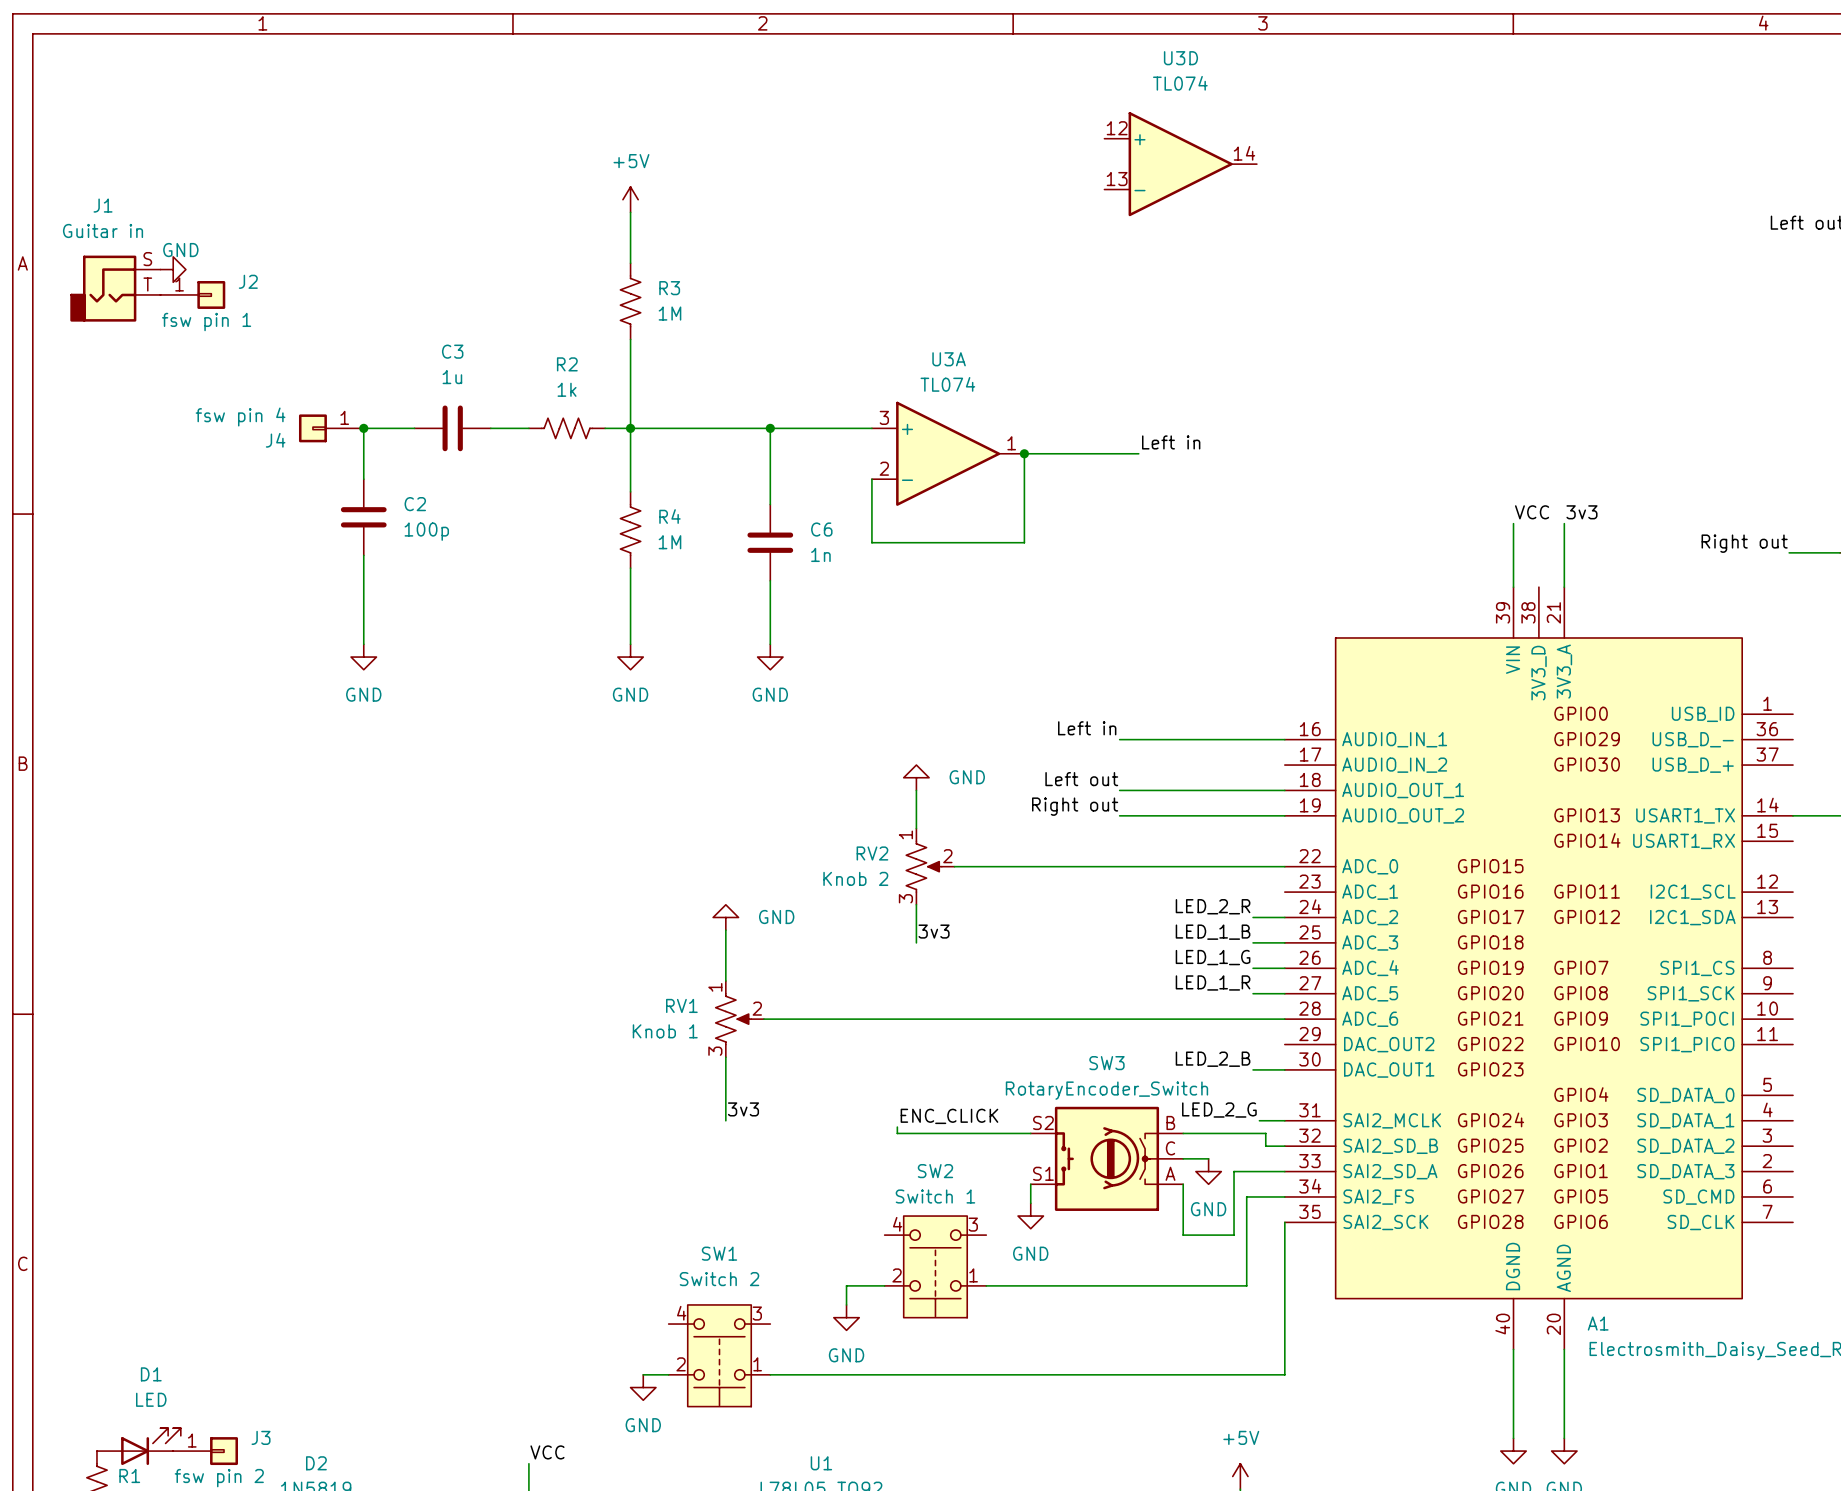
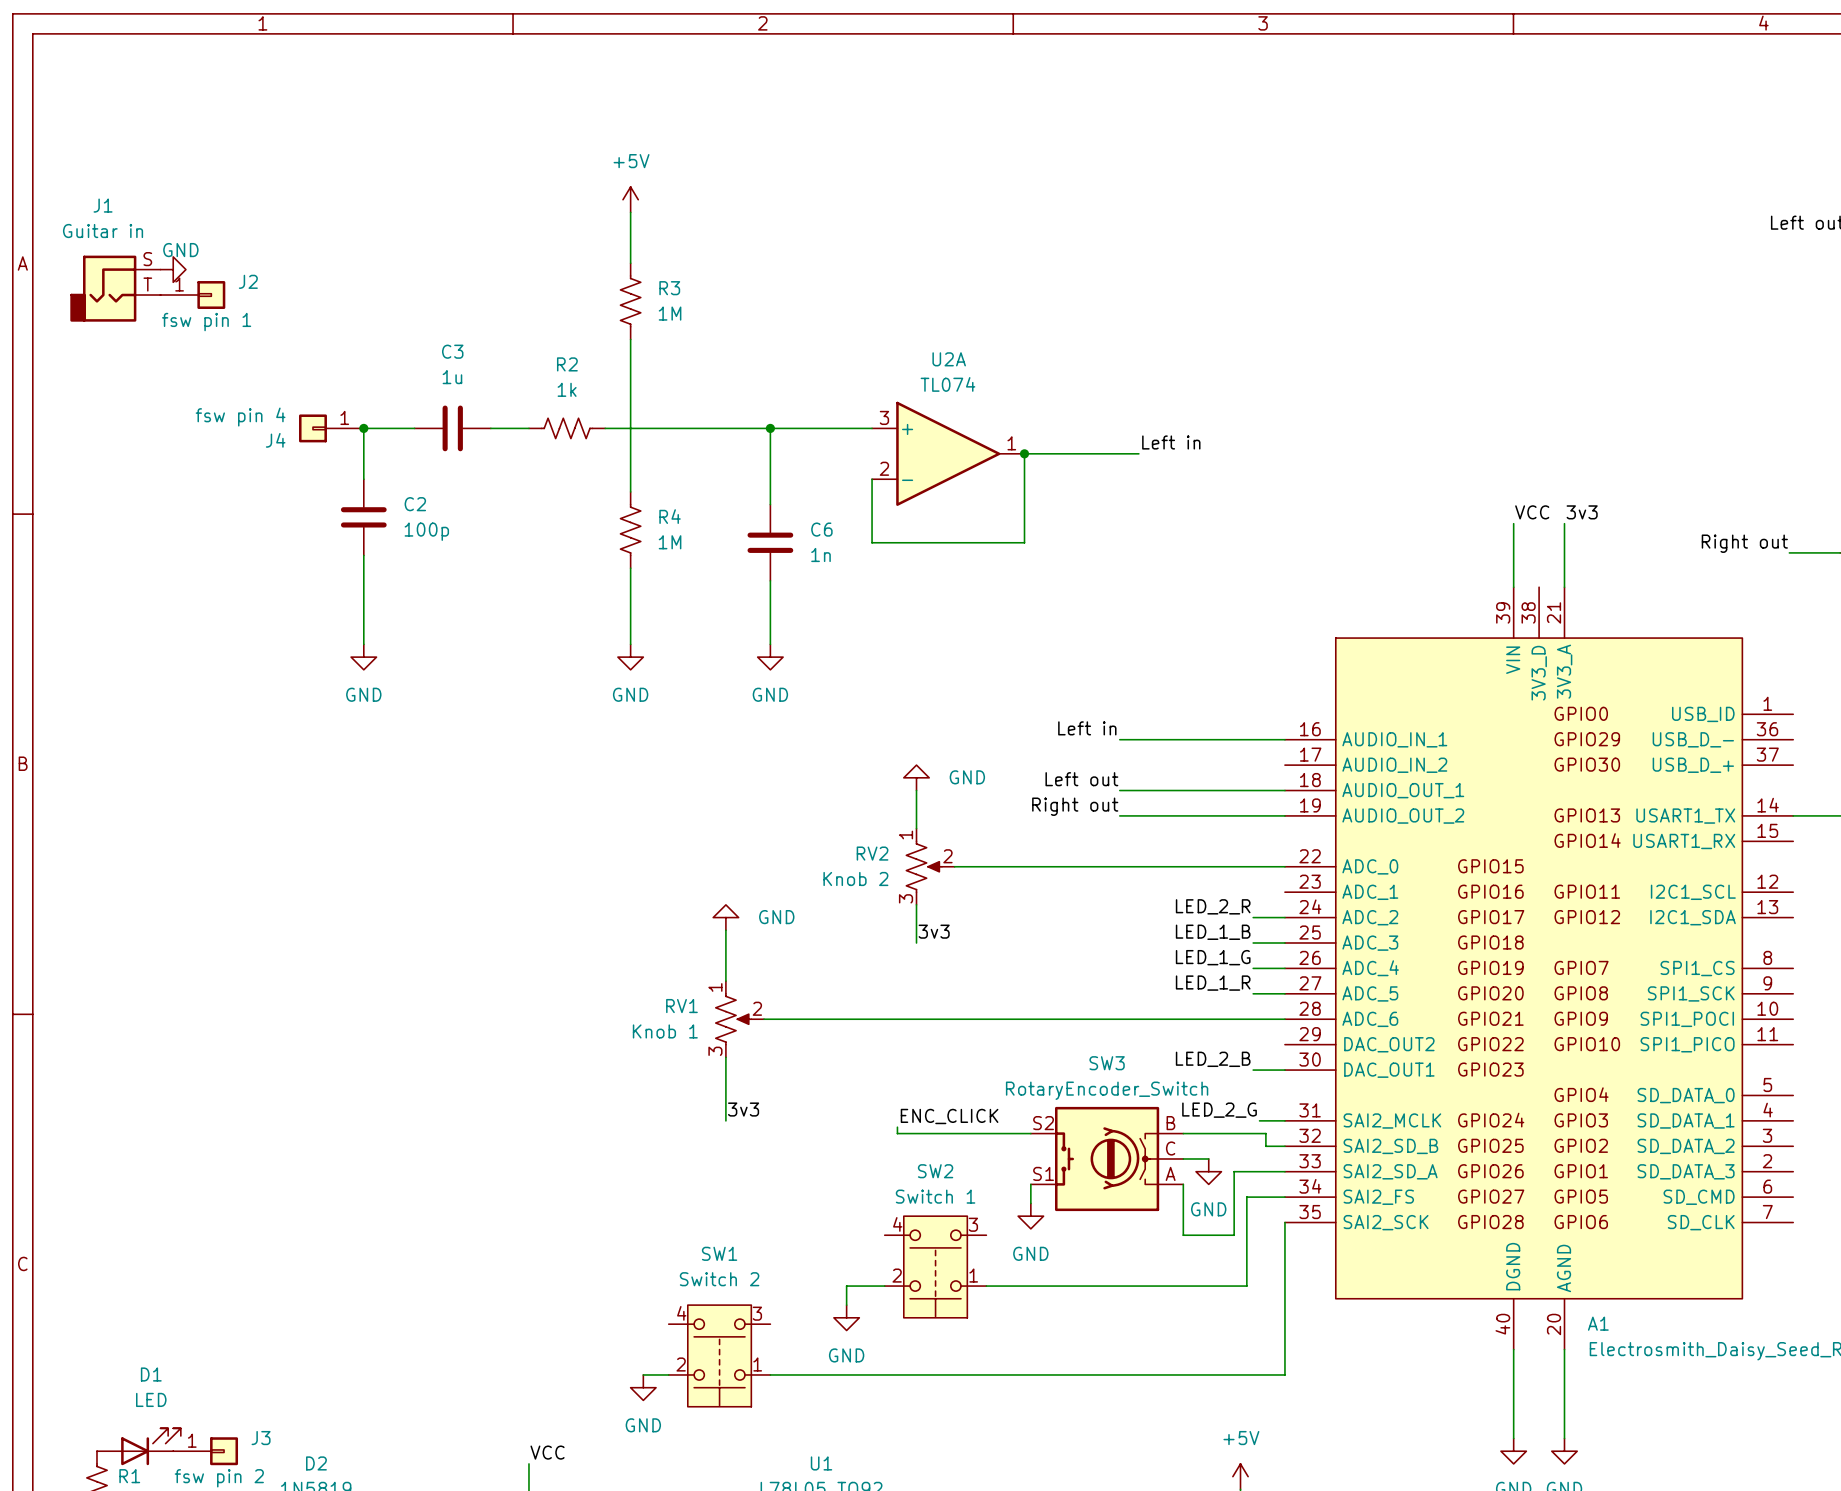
U3D: TL074 (1180, 164) -> none
U3A name: U3A (949, 359) -> U2A (949, 359)
junction: (630, 428) -> none

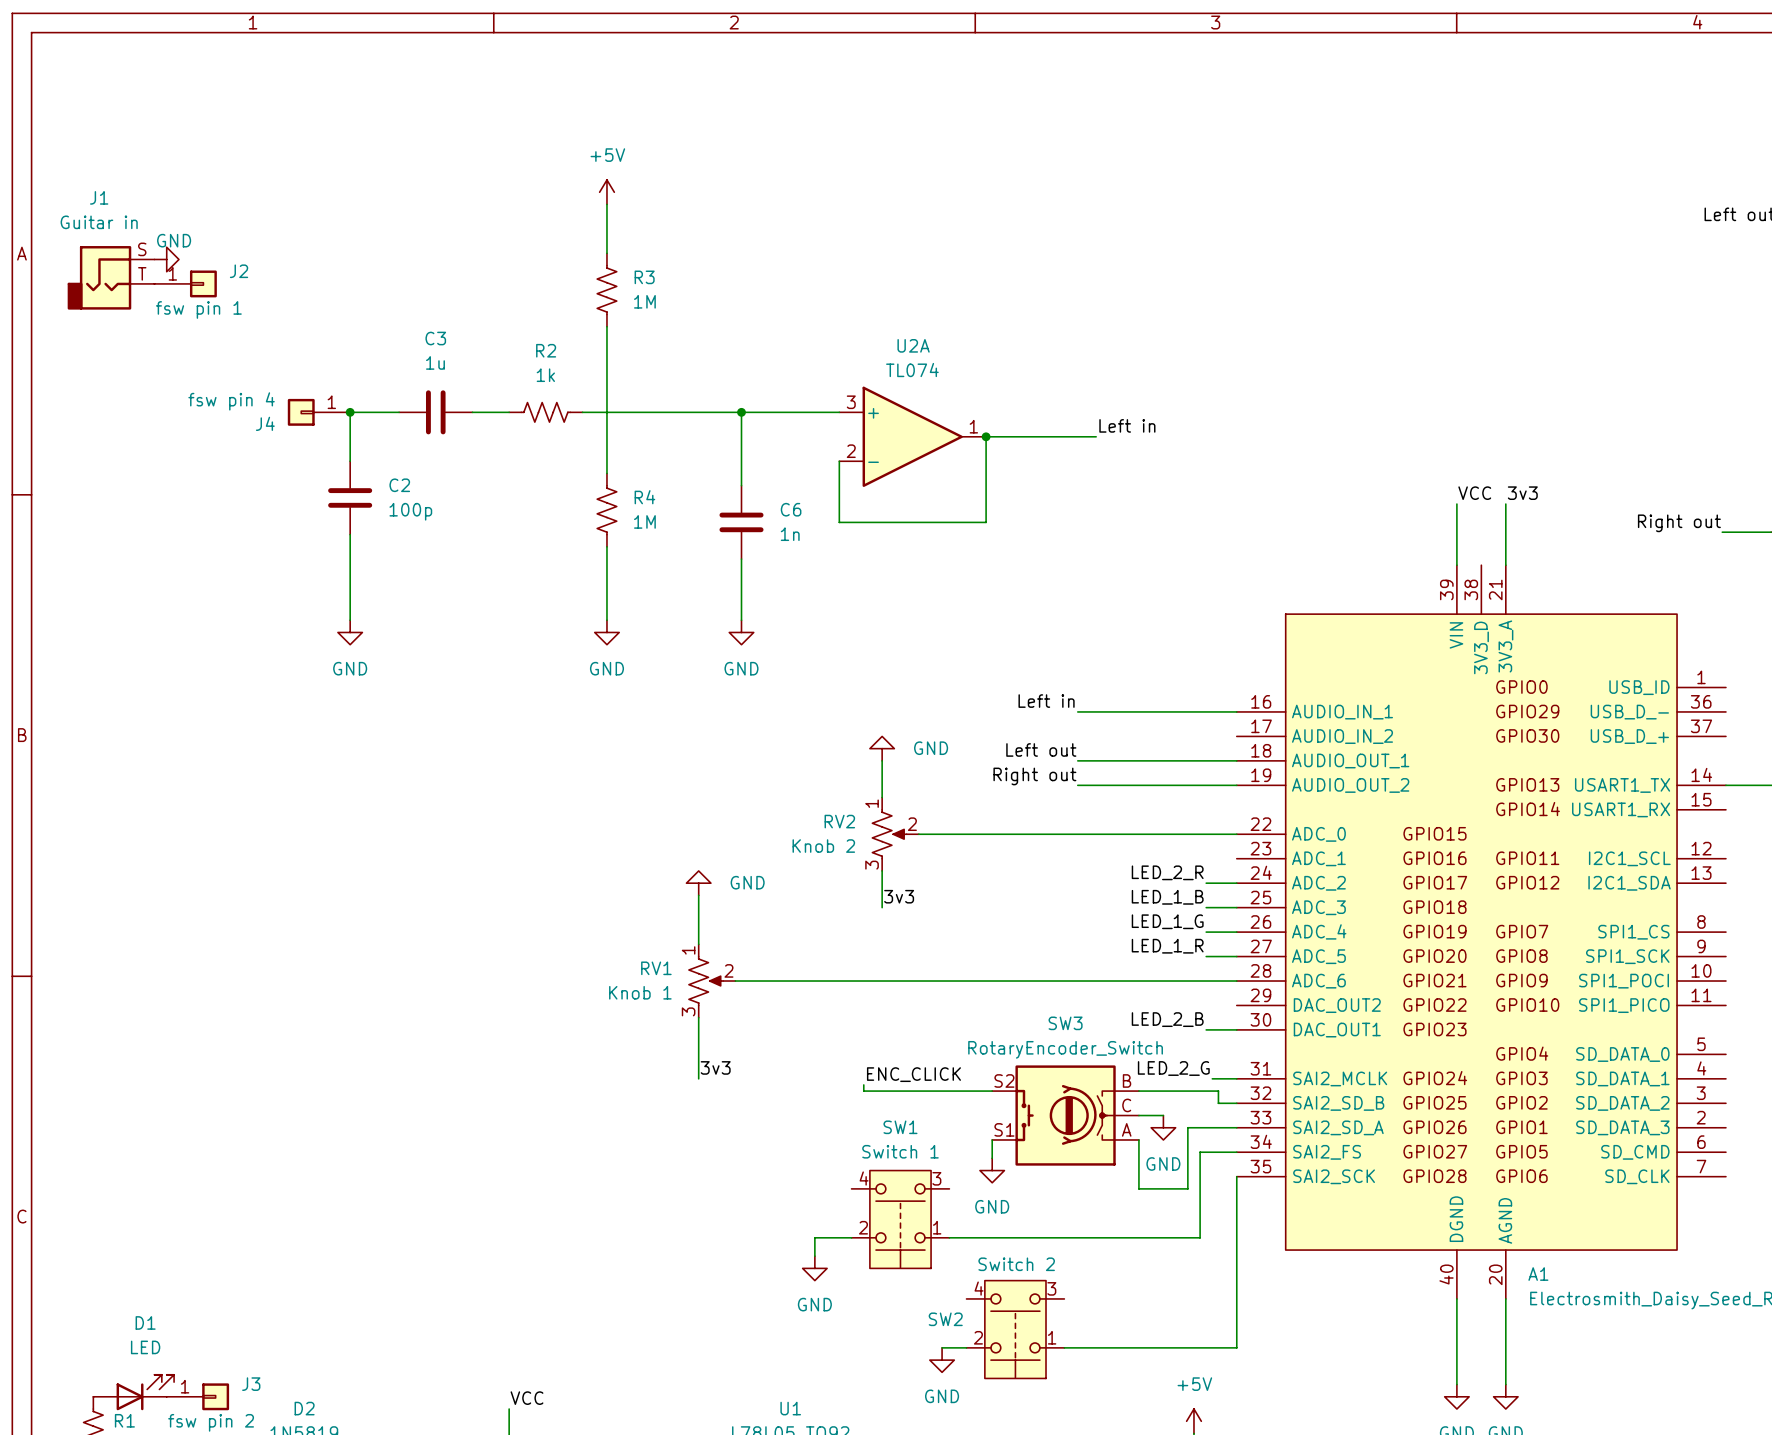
SW2 name: SW2 (935, 1171) -> SW1 (900, 1127)
SW1: Switch 2 (719, 1355) -> none
wire: (643, 1374) (668, 1374) -> none
wire: (770, 1374) (1284, 1374) -> (1064, 1347) (1236, 1347) (1236, 1323)
SW2: none -> Switch 2 (1015, 1329)
power symbol: GND (643, 1387) -> none
wire: none -> (942, 1347) (966, 1347)
power symbol: none -> GND (942, 1360)

